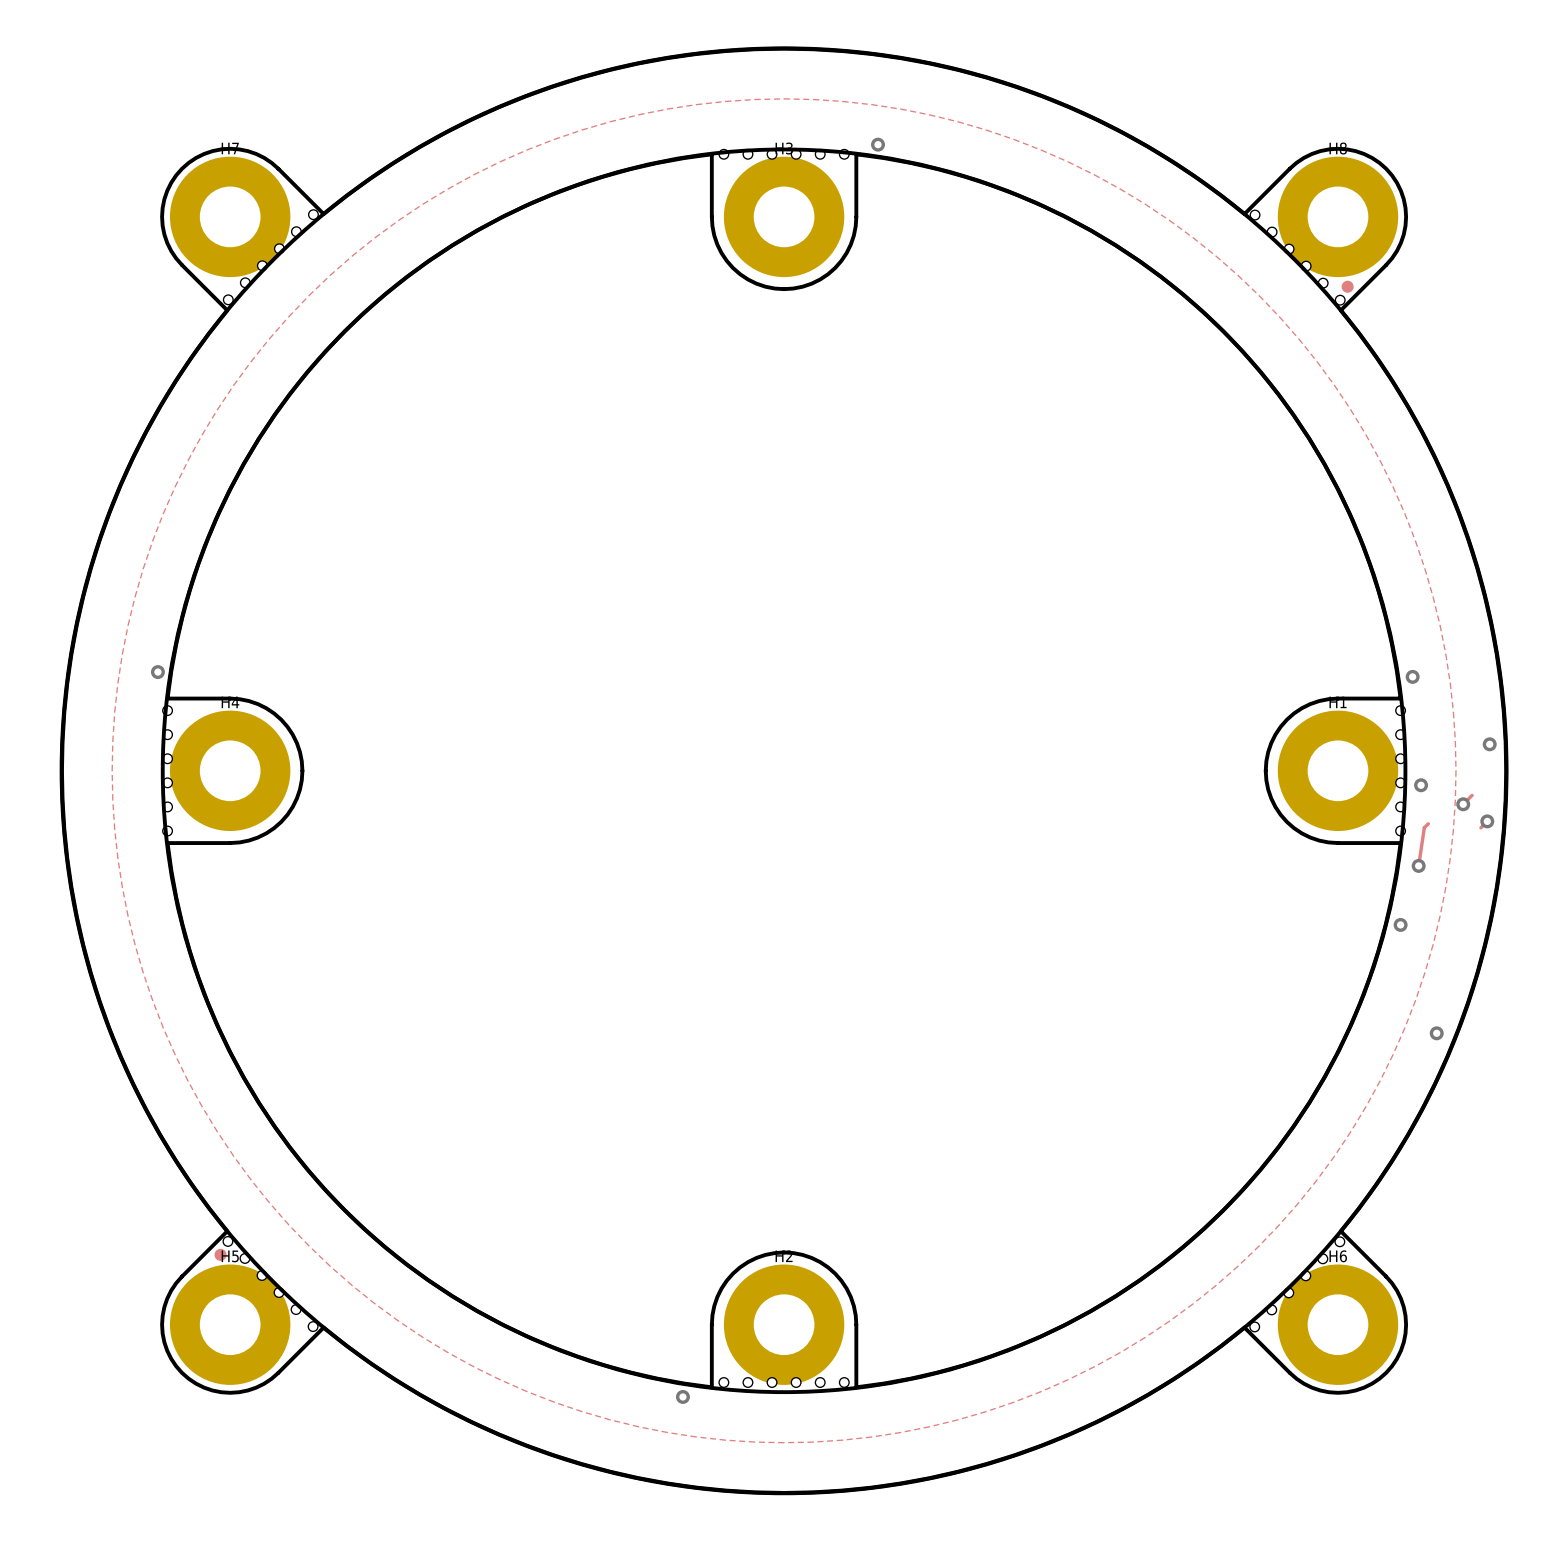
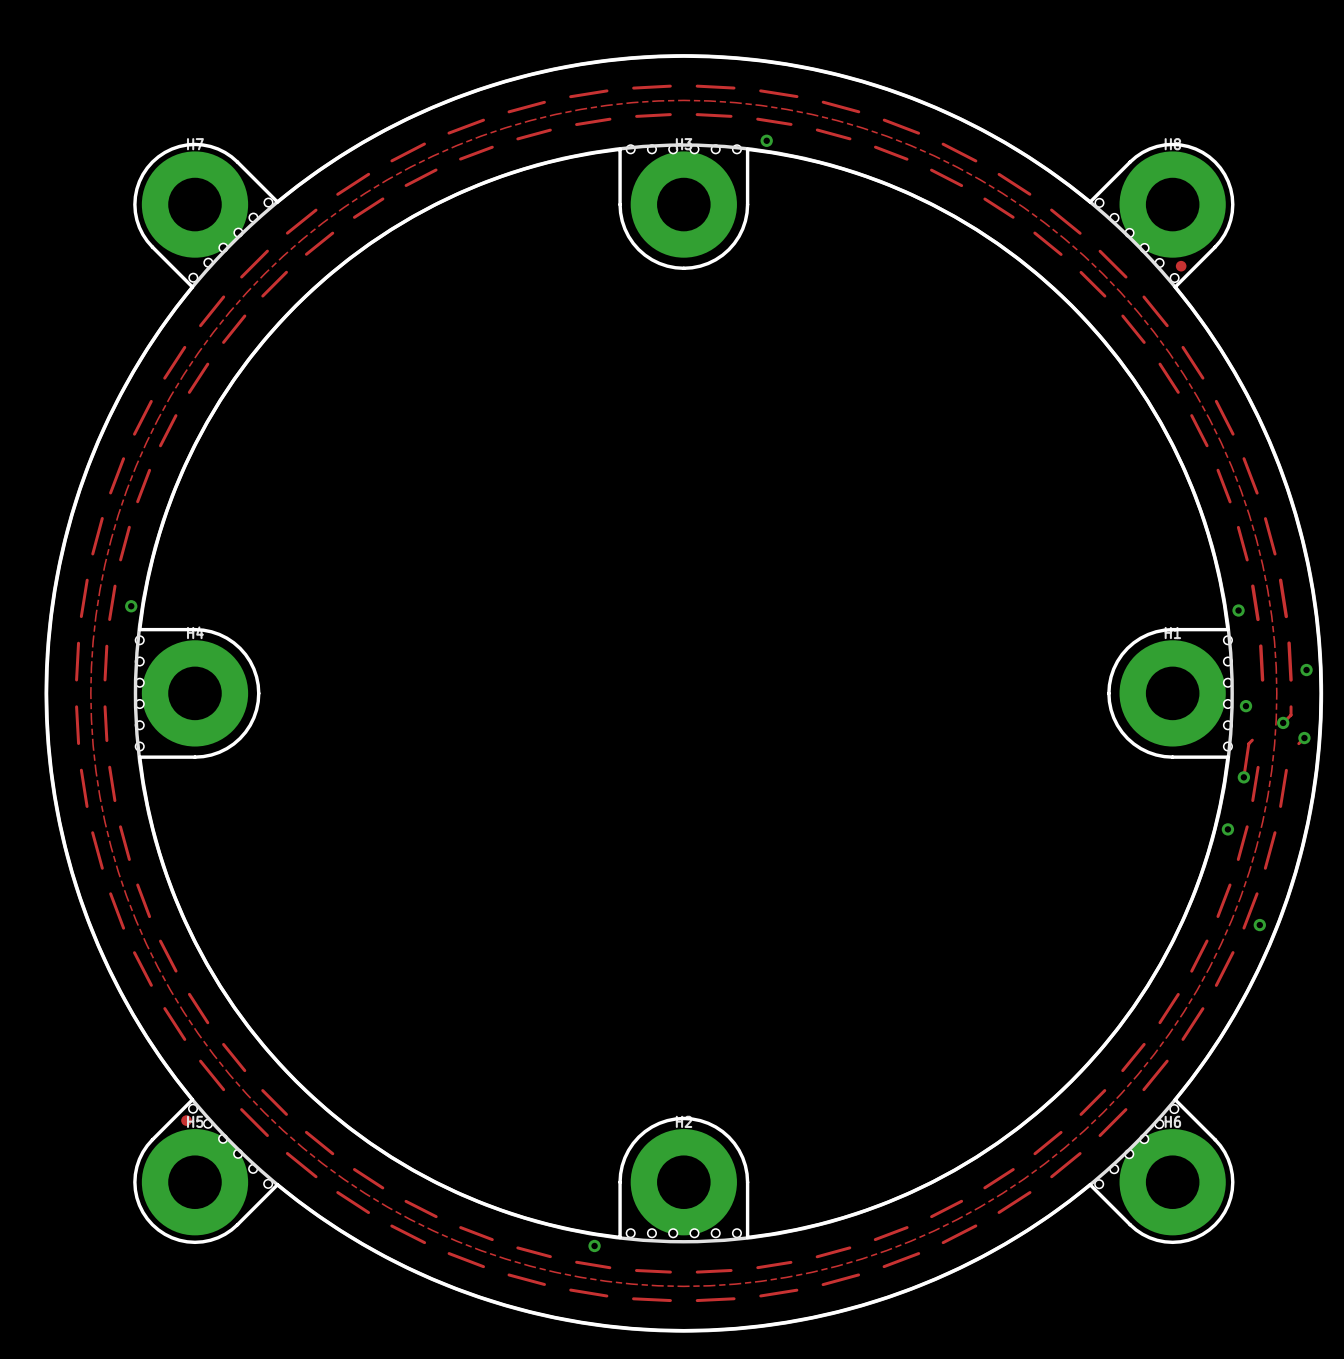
track: none -> (670, 86) (633, 88)
track: none -> (697, 86) (734, 88)
track: none -> (607, 90) (570, 96)
track: none -> (760, 90) (797, 96)
track: none -> (823, 102) (858, 111)
track: none -> (544, 102) (509, 111)
track: none -> (670, 114) (636, 116)
track: none -> (697, 114) (731, 116)
track: none -> (609, 119) (576, 124)
track: none -> (757, 119) (791, 124)
track: none -> (483, 120) (448, 133)
track: none -> (884, 120) (918, 133)
track: none -> (550, 130) (517, 138)
track: none -> (817, 129) (849, 138)
track: none -> (424, 143) (391, 160)
track: none -> (943, 144) (975, 160)
track: none -> (492, 147) (460, 159)
track: none -> (875, 147) (907, 159)
track: none -> (436, 169) (406, 185)
track: none -> (931, 170) (961, 185)
track: none -> (368, 174) (337, 194)
track: none -> (999, 174) (1029, 194)
track: none -> (382, 198) (354, 217)
track: none -> (984, 198) (1013, 217)
track: none -> (316, 210) (287, 233)
track: none -> (1051, 210) (1080, 233)
track: none -> (332, 233) (306, 254)
track: none -> (1034, 233) (1061, 254)
track: none -> (267, 251) (241, 277)
track: none -> (1100, 251) (1126, 277)
track: none -> (286, 272) (262, 296)
track: none -> (1081, 272) (1104, 296)
track: none -> (223, 296) (200, 325)
track: none -> (1143, 296) (1167, 325)
track: none -> (244, 315) (223, 342)
track: none -> (1122, 316) (1144, 342)
track: none -> (184, 347) (164, 378)
track: none -> (1182, 347) (1202, 378)
track: none -> (207, 364) (189, 392)
track: none -> (1159, 364) (1178, 392)
track: none -> (151, 401) (134, 434)
track: none -> (1216, 401) (1233, 434)
track: none -> (175, 415) (160, 445)
track: none -> (1191, 415) (1207, 445)
track: none -> (123, 458) (110, 492)
track: none -> (1243, 458) (1257, 493)
track: none -> (149, 470) (137, 501)
track: none -> (1217, 470) (1230, 501)
track: none -> (102, 518) (92, 553)
track: none -> (1265, 518) (1275, 554)
track: none -> (129, 527) (120, 559)
track: none -> (1238, 527) (1247, 559)
track: none -> (87, 580) (81, 616)
track: none -> (1280, 580) (1286, 616)
track: none -> (115, 586) (109, 619)
track: none -> (1252, 586) (1257, 619)
track: none -> (78, 643) (76, 680)
track: none -> (1289, 643) (1291, 680)
track: none -> (106, 646) (105, 680)
track: none -> (1260, 646) (1262, 680)
track: none -> (76, 706) (78, 743)
track: none -> (105, 706) (106, 740)
track: none -> (1291, 706) (1291, 715)
track: none -> (109, 767) (114, 800)
track: none -> (1258, 767) (1252, 800)
track: none -> (81, 770) (87, 806)
track: none -> (1286, 770) (1280, 806)
track: none -> (120, 826) (129, 859)
track: none -> (1247, 826) (1238, 859)
track: none -> (92, 832) (102, 868)
track: none -> (1275, 832) (1265, 868)
track: none -> (137, 884) (149, 916)
track: none -> (1230, 884) (1217, 916)
track: none -> (110, 893) (123, 928)
track: none -> (1257, 893) (1243, 928)
track: none -> (160, 941) (176, 971)
track: none -> (1207, 940) (1191, 971)
track: none -> (134, 952) (151, 985)
track: none -> (1233, 952) (1216, 985)
track: none -> (189, 994) (207, 1022)
track: none -> (1178, 994) (1159, 1022)
track: none -> (164, 1008) (184, 1039)
track: none -> (1202, 1008) (1182, 1039)
track: none -> (223, 1044) (244, 1070)
track: none -> (1144, 1044) (1122, 1070)
track: none -> (200, 1061) (223, 1089)
track: none -> (1167, 1061) (1143, 1089)
track: none -> (262, 1090) (286, 1114)
track: none -> (1104, 1090) (1080, 1114)
track: none -> (241, 1109) (267, 1135)
track: none -> (1125, 1109) (1100, 1135)
track: none -> (306, 1132) (332, 1153)
track: none -> (1061, 1132) (1034, 1153)
track: none -> (287, 1153) (316, 1176)
track: none -> (1080, 1153) (1051, 1176)
track: none -> (354, 1169) (382, 1187)
track: none -> (1013, 1169) (984, 1187)
track: none -> (337, 1192) (368, 1212)
track: none -> (1030, 1192) (999, 1212)
track: none -> (406, 1201) (436, 1216)
track: none -> (961, 1201) (931, 1216)
track: none -> (391, 1225) (424, 1242)
track: none -> (975, 1225) (943, 1242)
track: none -> (460, 1227) (492, 1239)
track: none -> (907, 1227) (875, 1239)
track: none -> (517, 1247) (550, 1256)
track: none -> (849, 1247) (817, 1256)
track: none -> (449, 1253) (483, 1266)
track: none -> (918, 1253) (884, 1266)
track: none -> (576, 1262) (609, 1267)
track: none -> (790, 1262) (757, 1267)
track: none -> (636, 1270) (670, 1272)
track: none -> (731, 1270) (697, 1272)
track: none -> (509, 1274) (544, 1284)
track: none -> (858, 1274) (823, 1284)
track: none -> (570, 1290) (606, 1296)
track: none -> (796, 1290) (760, 1295)
track: none -> (633, 1298) (670, 1300)
track: none -> (734, 1298) (697, 1300)

